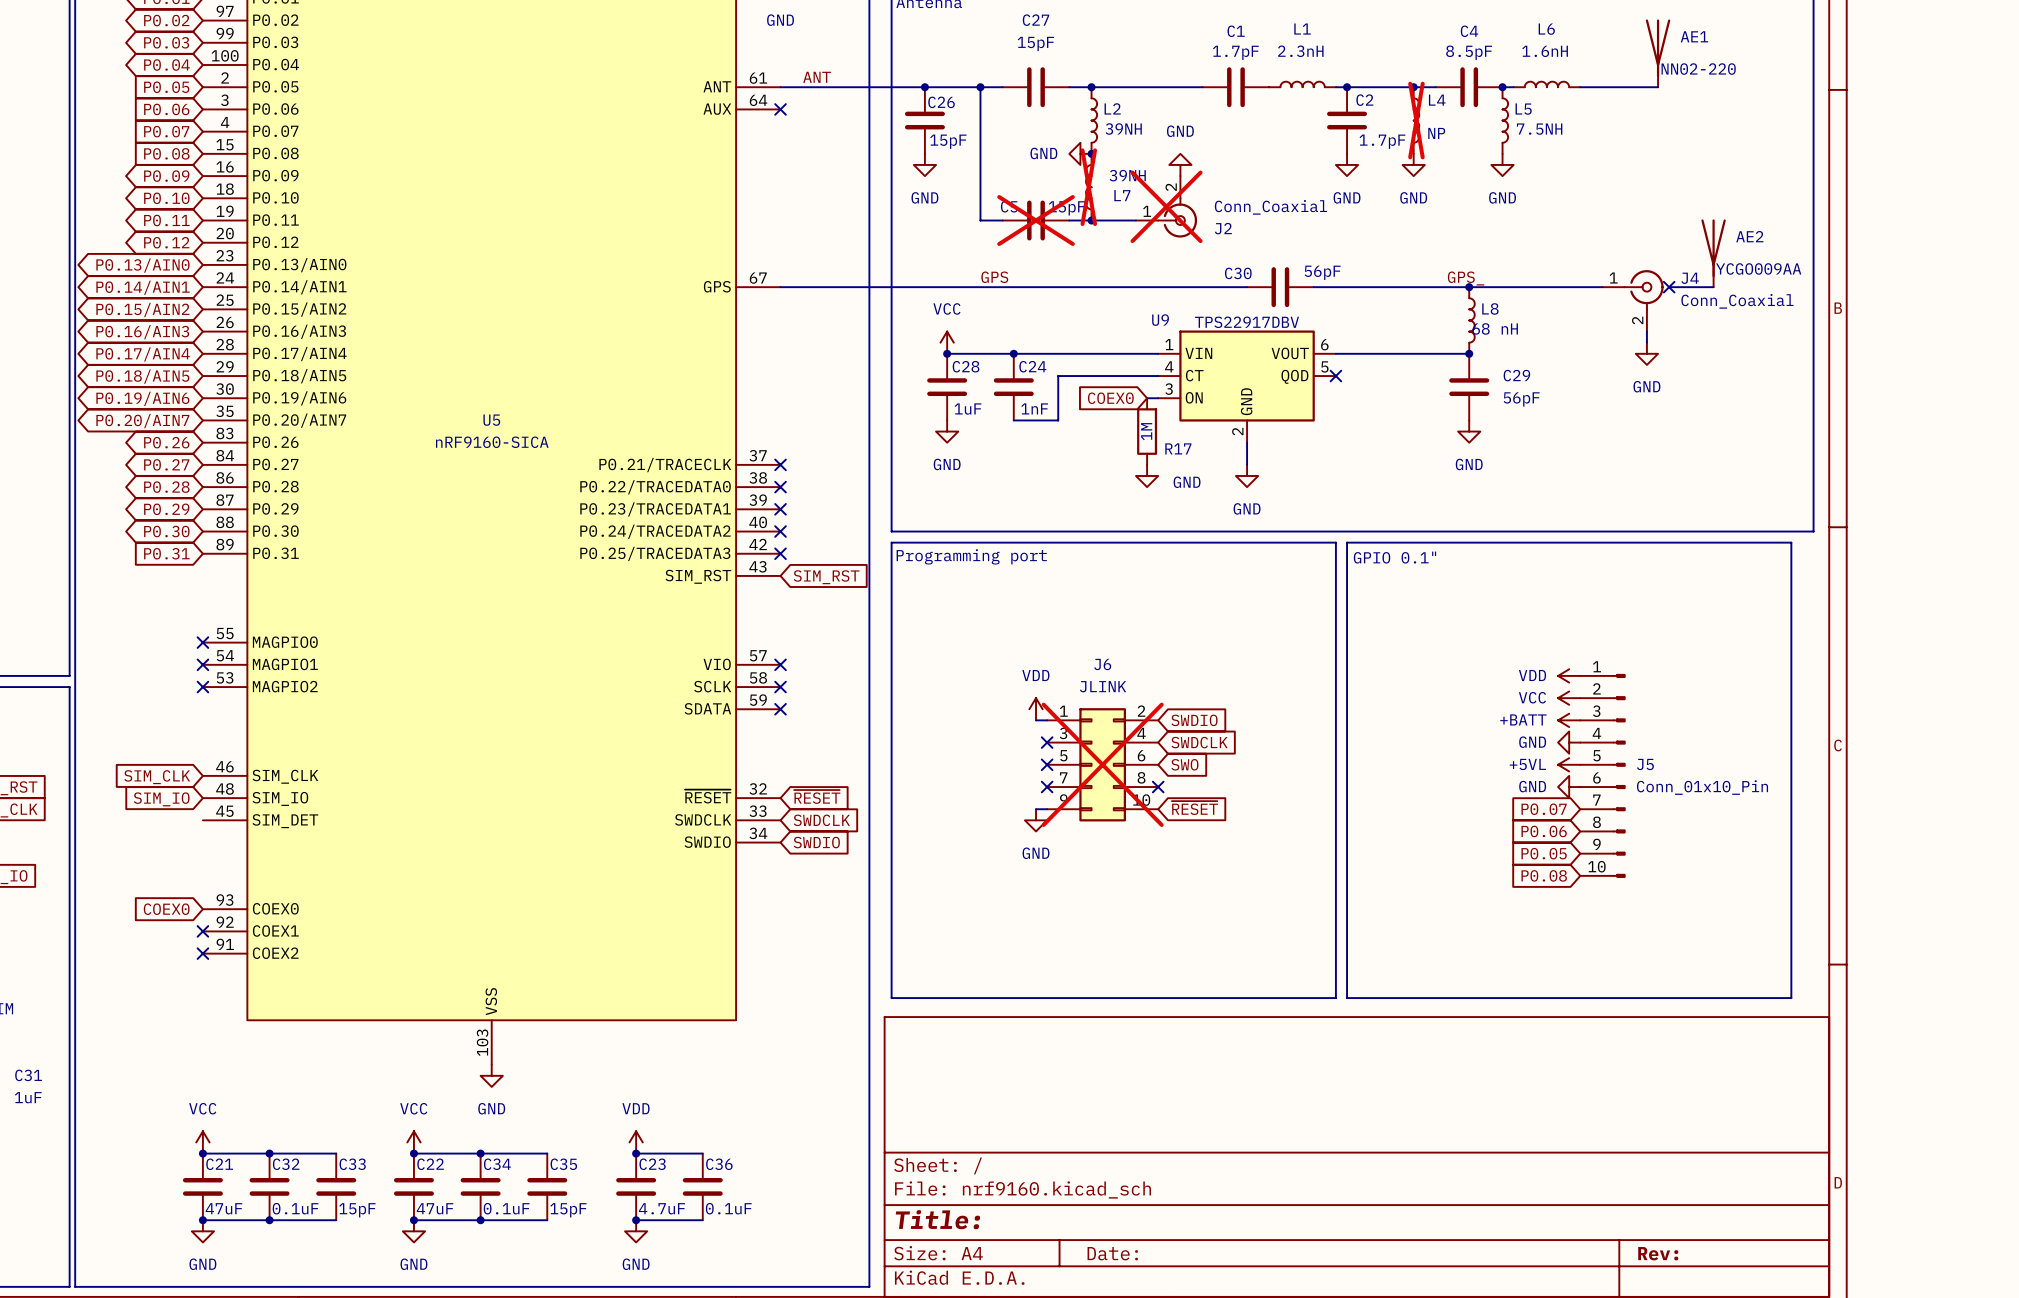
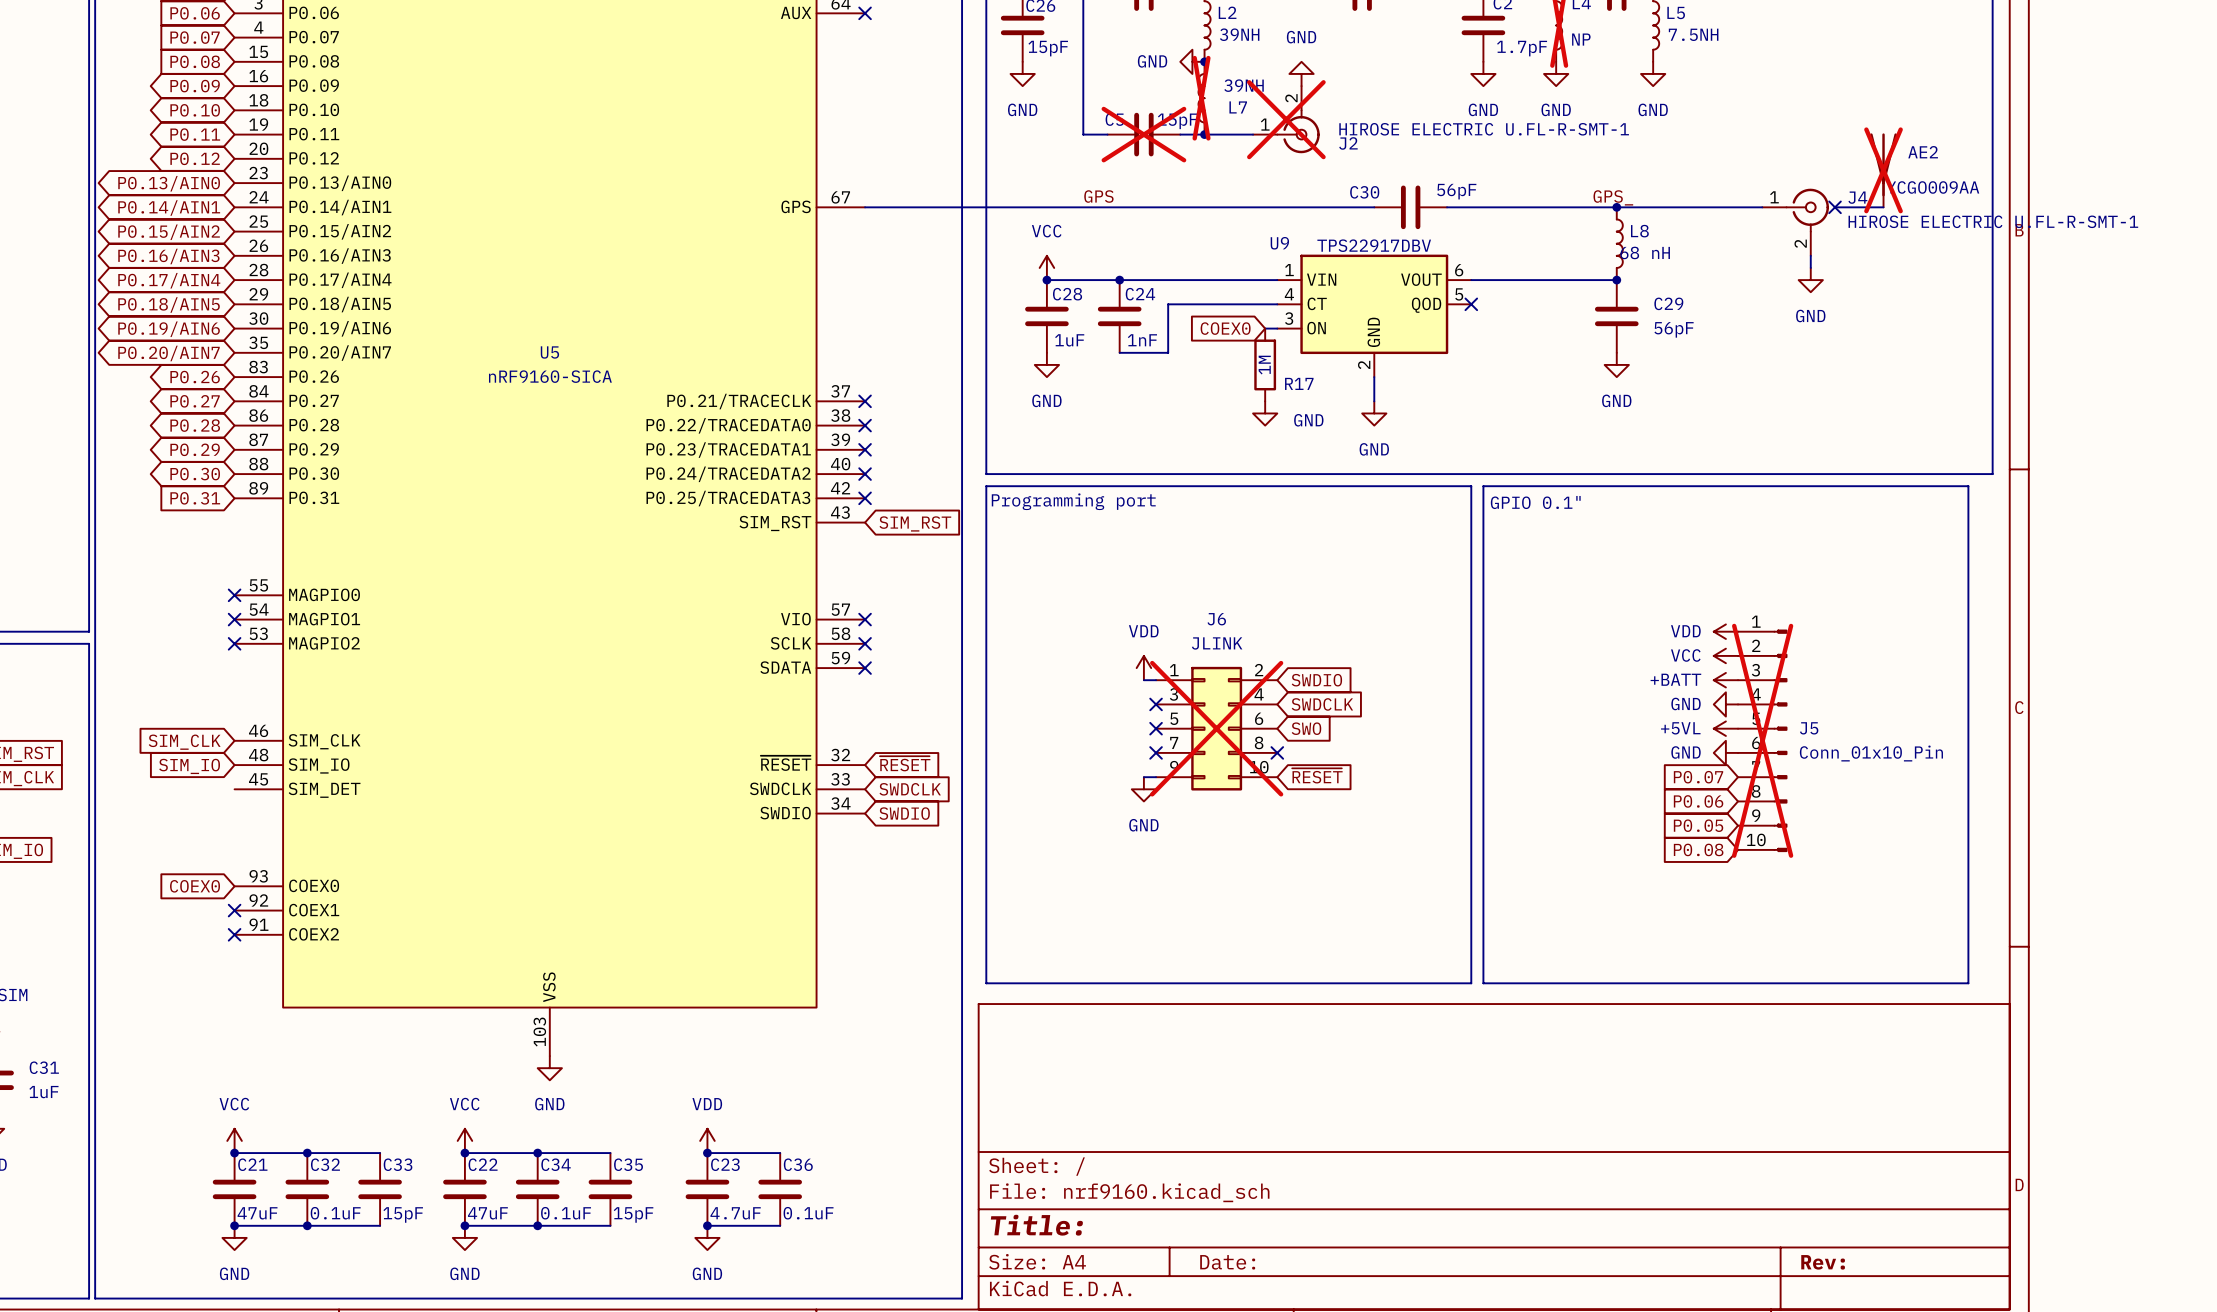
J2 value: Conn_Coaxial (1270, 207) -> HIROSE ELECTRIC U.FL-R-SMT-1 (1484, 129)
AE2 do-not-place cross: none -> (1883, 170)
J4 value: Conn_Coaxial (1737, 301) -> HIROSE ELECTRIC U.FL-R-SMT-1 (1993, 221)
J5 do-not-place cross: none -> (1762, 740)

